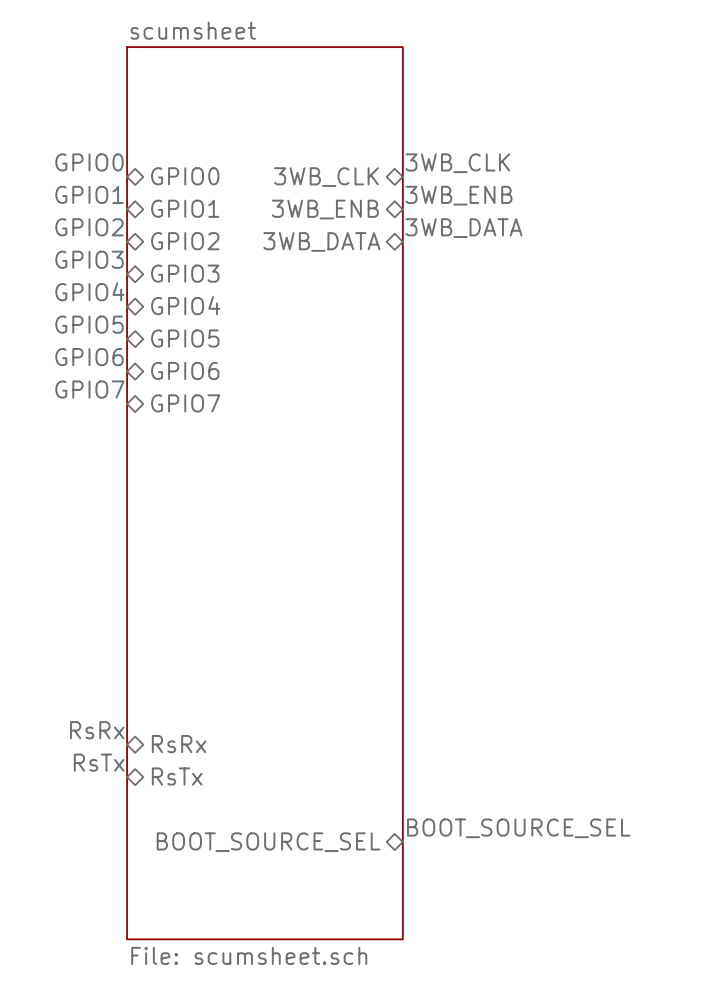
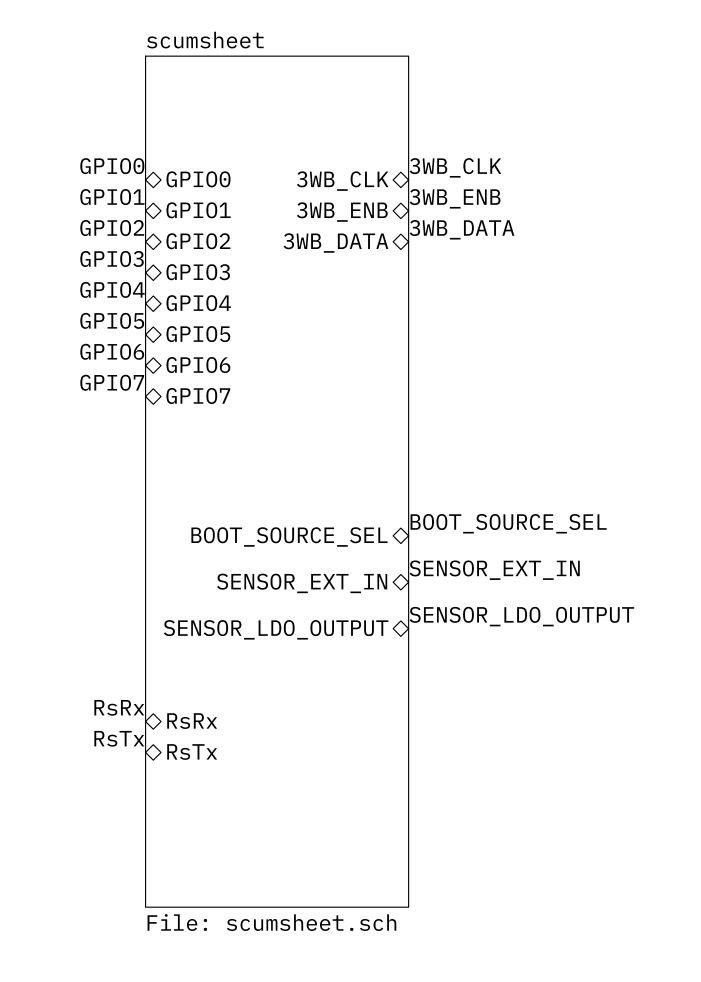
label: none -> SENSOR_EXT_IN (494, 570)
sheet pin: none -> SENSOR_EXT_IN (302, 583)
label: none -> SENSOR_LDO_OUTPUT (521, 616)
sheet pin: none -> SENSOR_LDO_OUTPUT (276, 629)
label position: BOOT_SOURCE_SEL (518, 828) -> BOOT_SOURCE_SEL (508, 523)
sheet pin position: BOOT_SOURCE_SEL (268, 842) -> BOOT_SOURCE_SEL (289, 536)

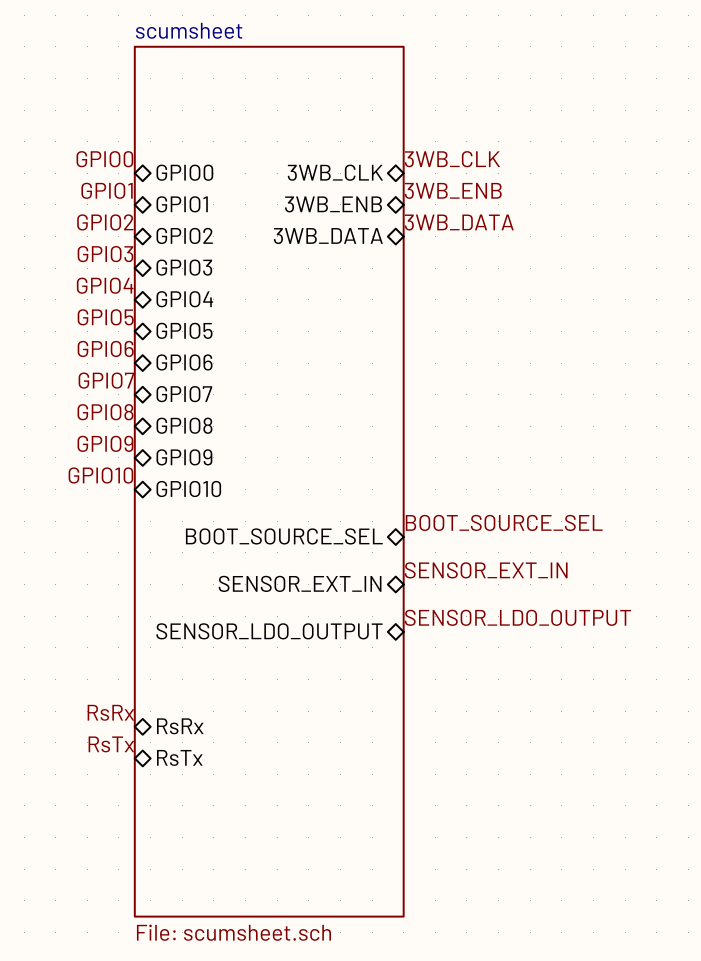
label: none -> GPIO8 (105, 412)
sheet pin: none -> GPIO8 (184, 425)
label: none -> GPIO9 (105, 443)
sheet pin: none -> GPIO9 (184, 457)
label: none -> GPIO10 (100, 475)
sheet pin: none -> GPIO10 (188, 489)

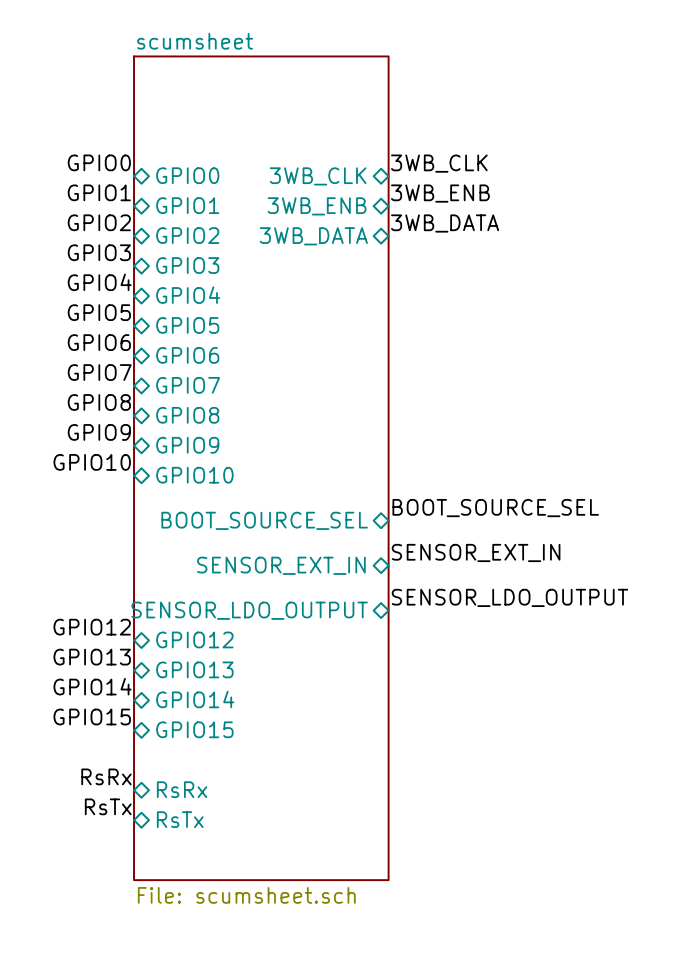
label: none -> GPIO12 (92, 627)
sheet pin: none -> GPIO12 (194, 639)
label: none -> GPIO13 (92, 657)
sheet pin: none -> GPIO13 (194, 669)
label: RsRx (110, 712) -> GPIO14 (92, 686)
sheet pin: RsRx (180, 726) -> GPIO14 (195, 699)
label: RsTx (111, 744) -> GPIO15 (92, 717)
sheet pin: RsTx (179, 757) -> GPIO15 (194, 729)
label: none -> RsRx (106, 776)
sheet pin: none -> RsRx (182, 789)
label: none -> RsTx (108, 806)
sheet pin: none -> RsTx (180, 819)

